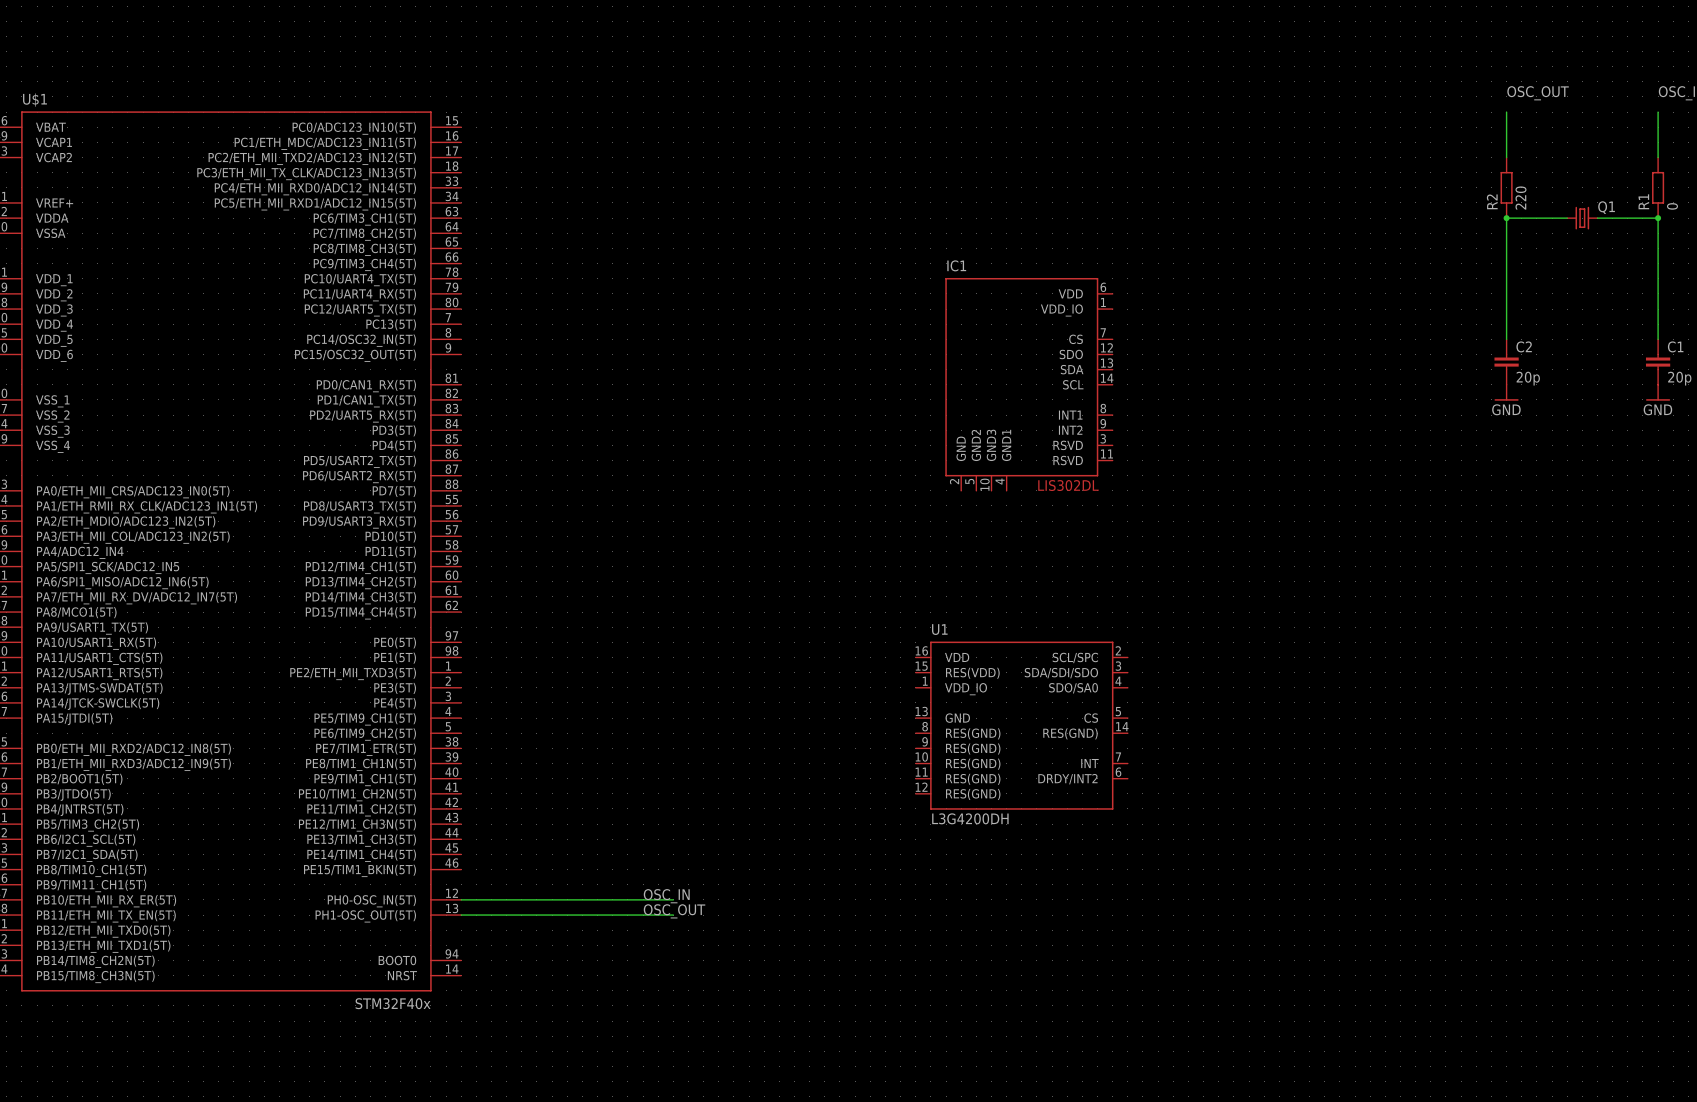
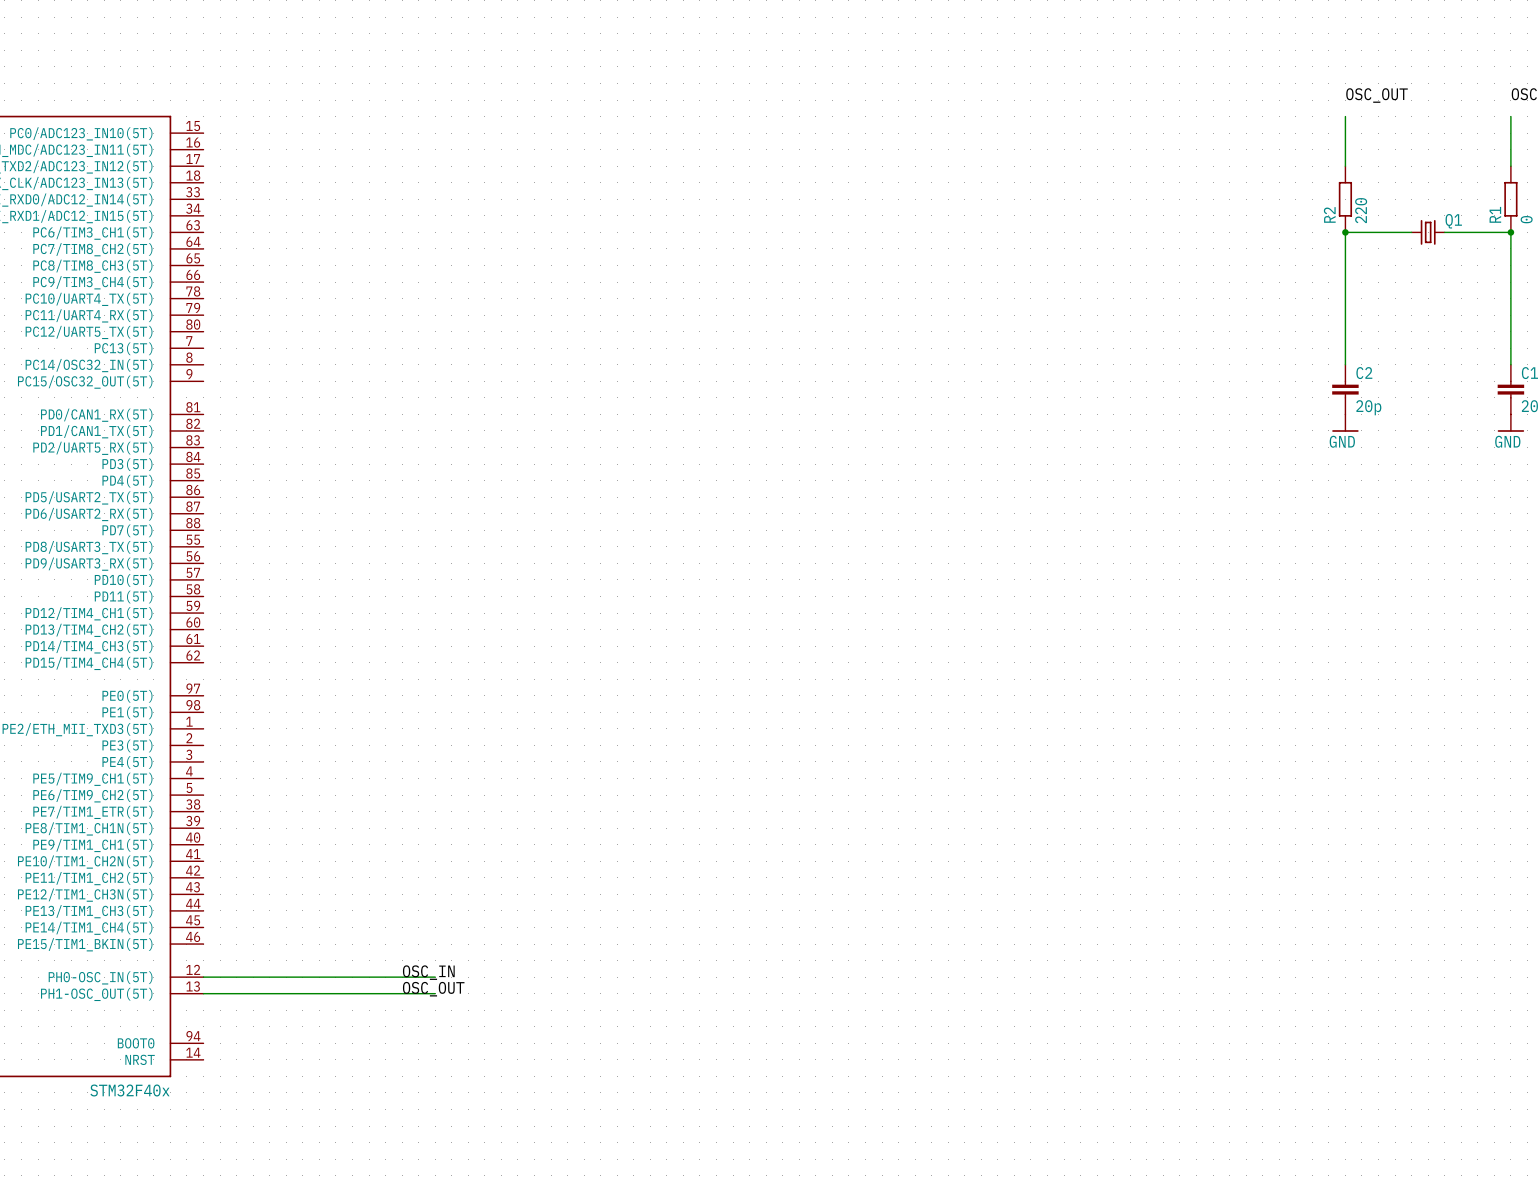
IC1: LIS302DL (1028, 384) -> none
U1: L3G4200DH (1021, 725) -> none

